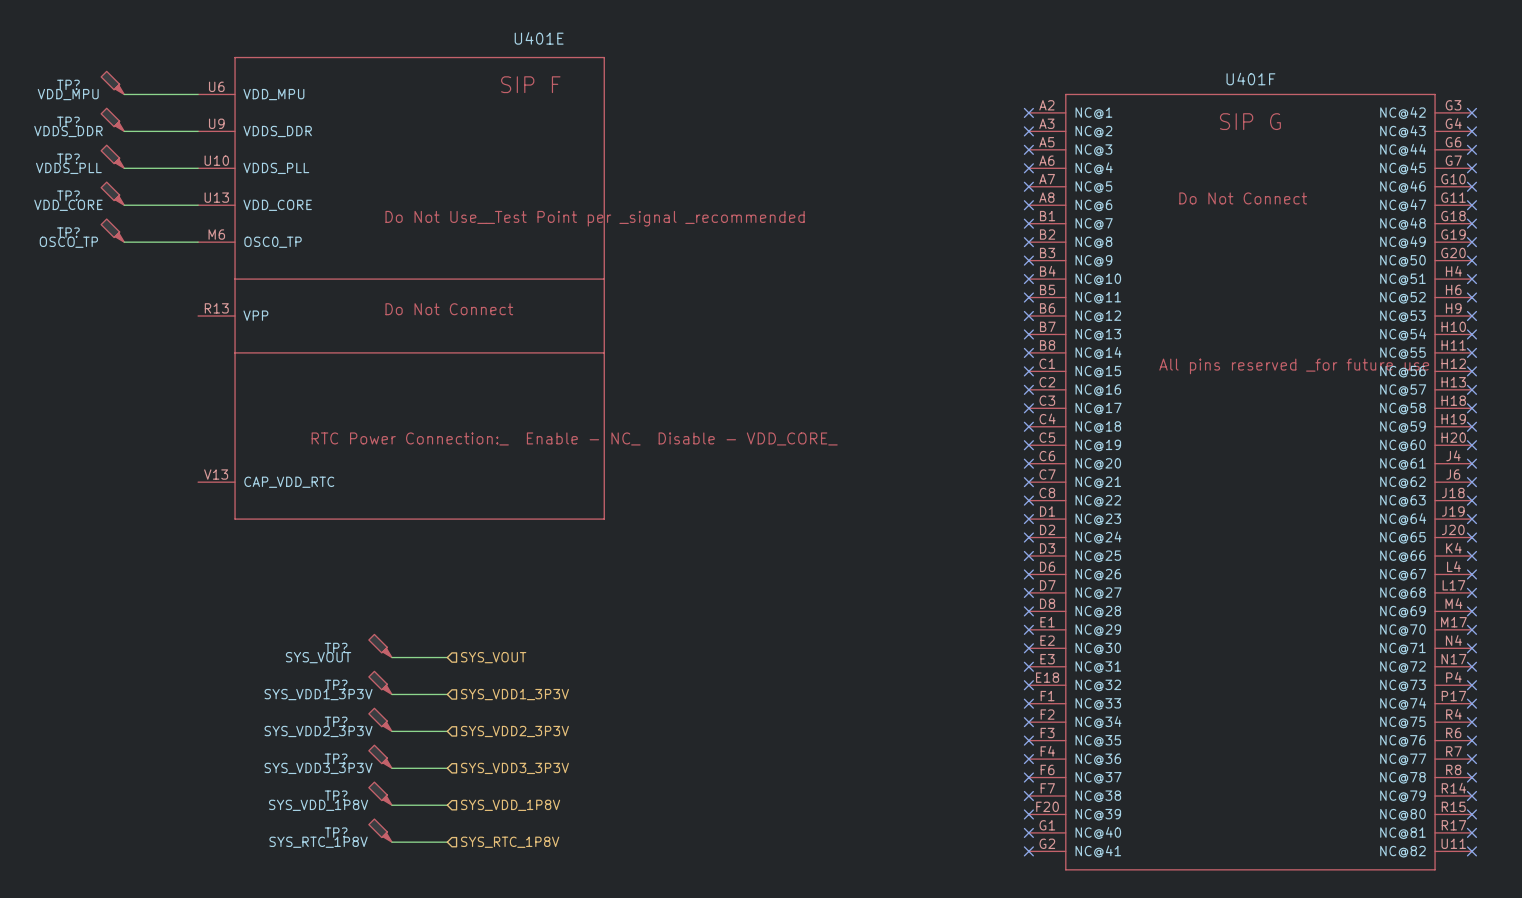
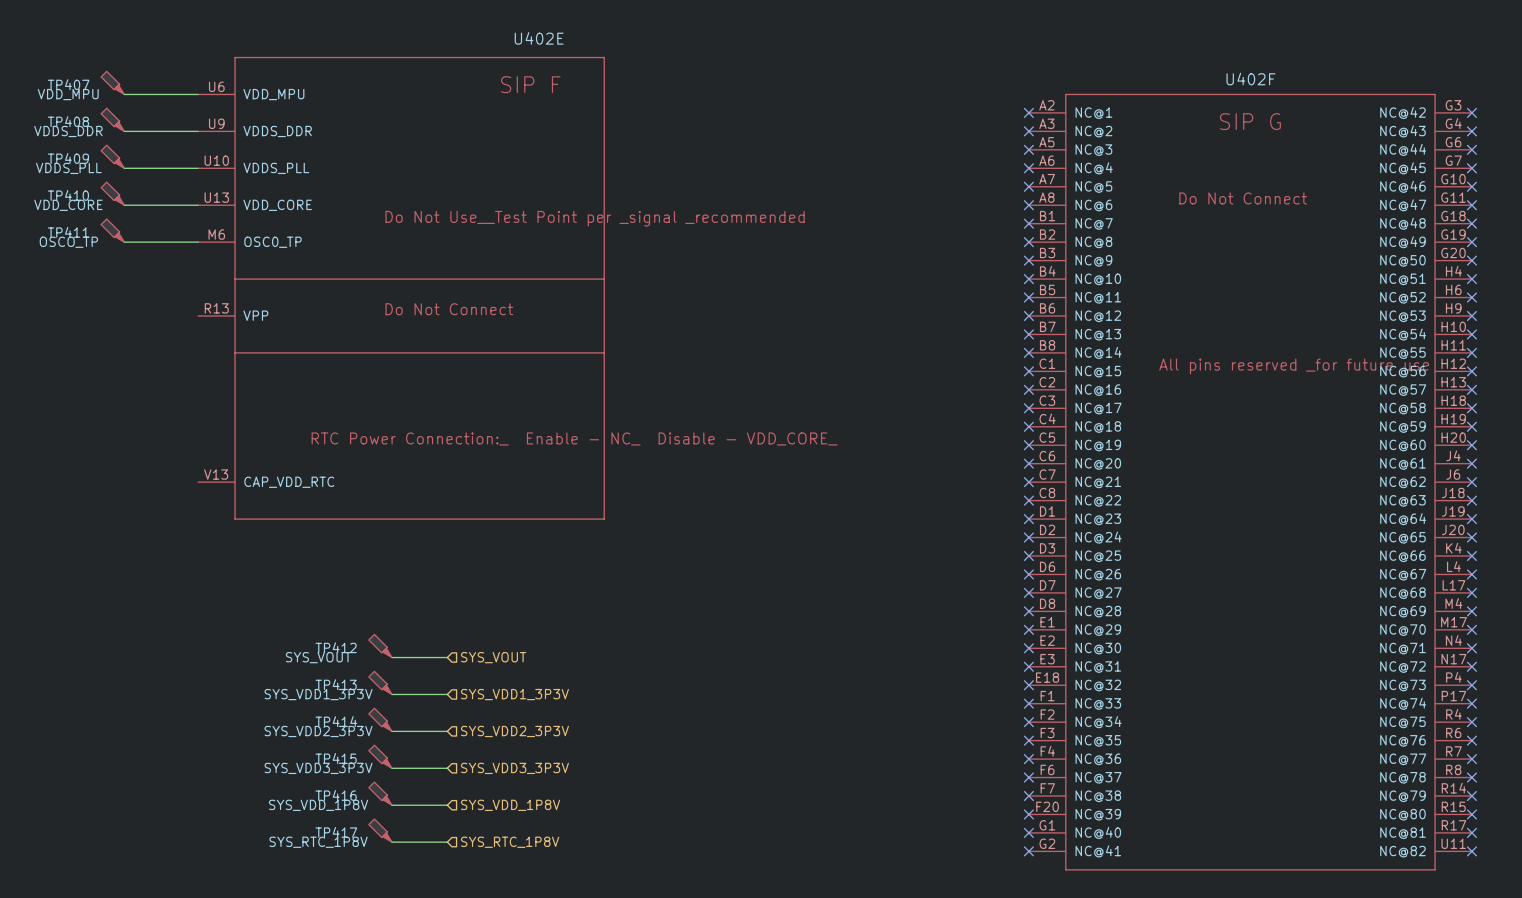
U401E name: U401E (539, 38) -> U402E (539, 38)
U401F name: U401F (1250, 79) -> U402F (1250, 79)
TP? name: TP? (68, 84) -> TP407 (68, 84)
TP? name: TP? (68, 121) -> TP408 (68, 121)
TP? name: TP? (68, 158) -> TP409 (68, 158)
TP? name: TP? (68, 195) -> TP410 (68, 195)
TP? name: TP? (68, 232) -> TP411 (68, 232)
TP? name: TP? (336, 647) -> TP412 (336, 647)
TP? name: TP? (336, 684) -> TP413 (336, 684)
TP? name: TP? (336, 721) -> TP414 (336, 721)
TP? name: TP? (336, 758) -> TP415 (336, 758)
TP? name: TP? (336, 795) -> TP416 (336, 795)
TP? name: TP? (336, 832) -> TP417 (336, 832)

